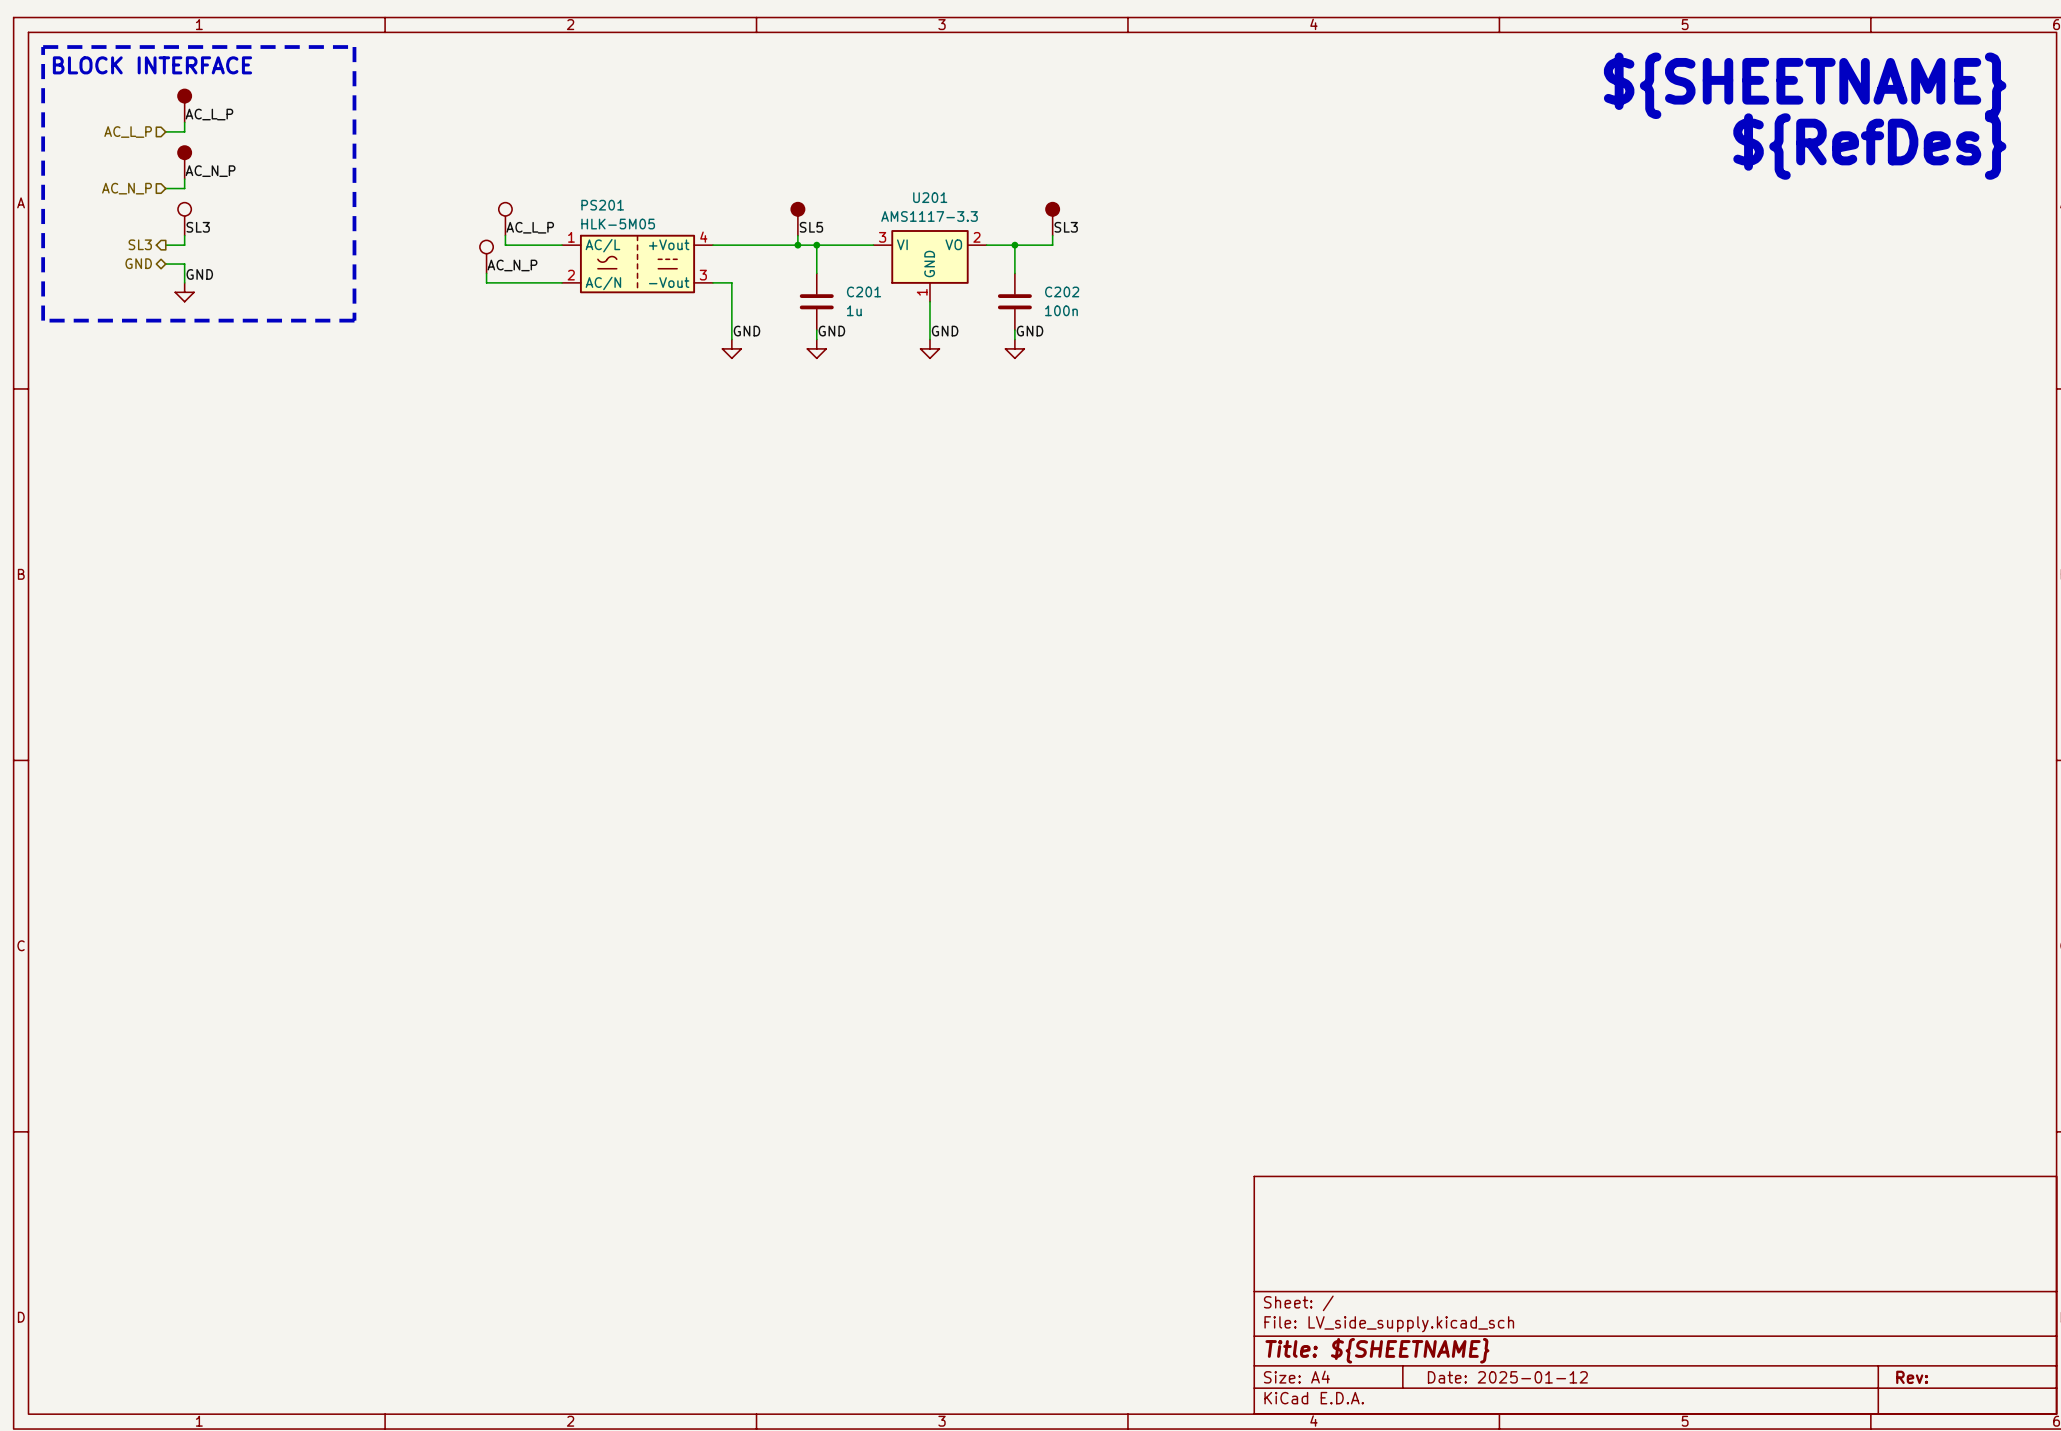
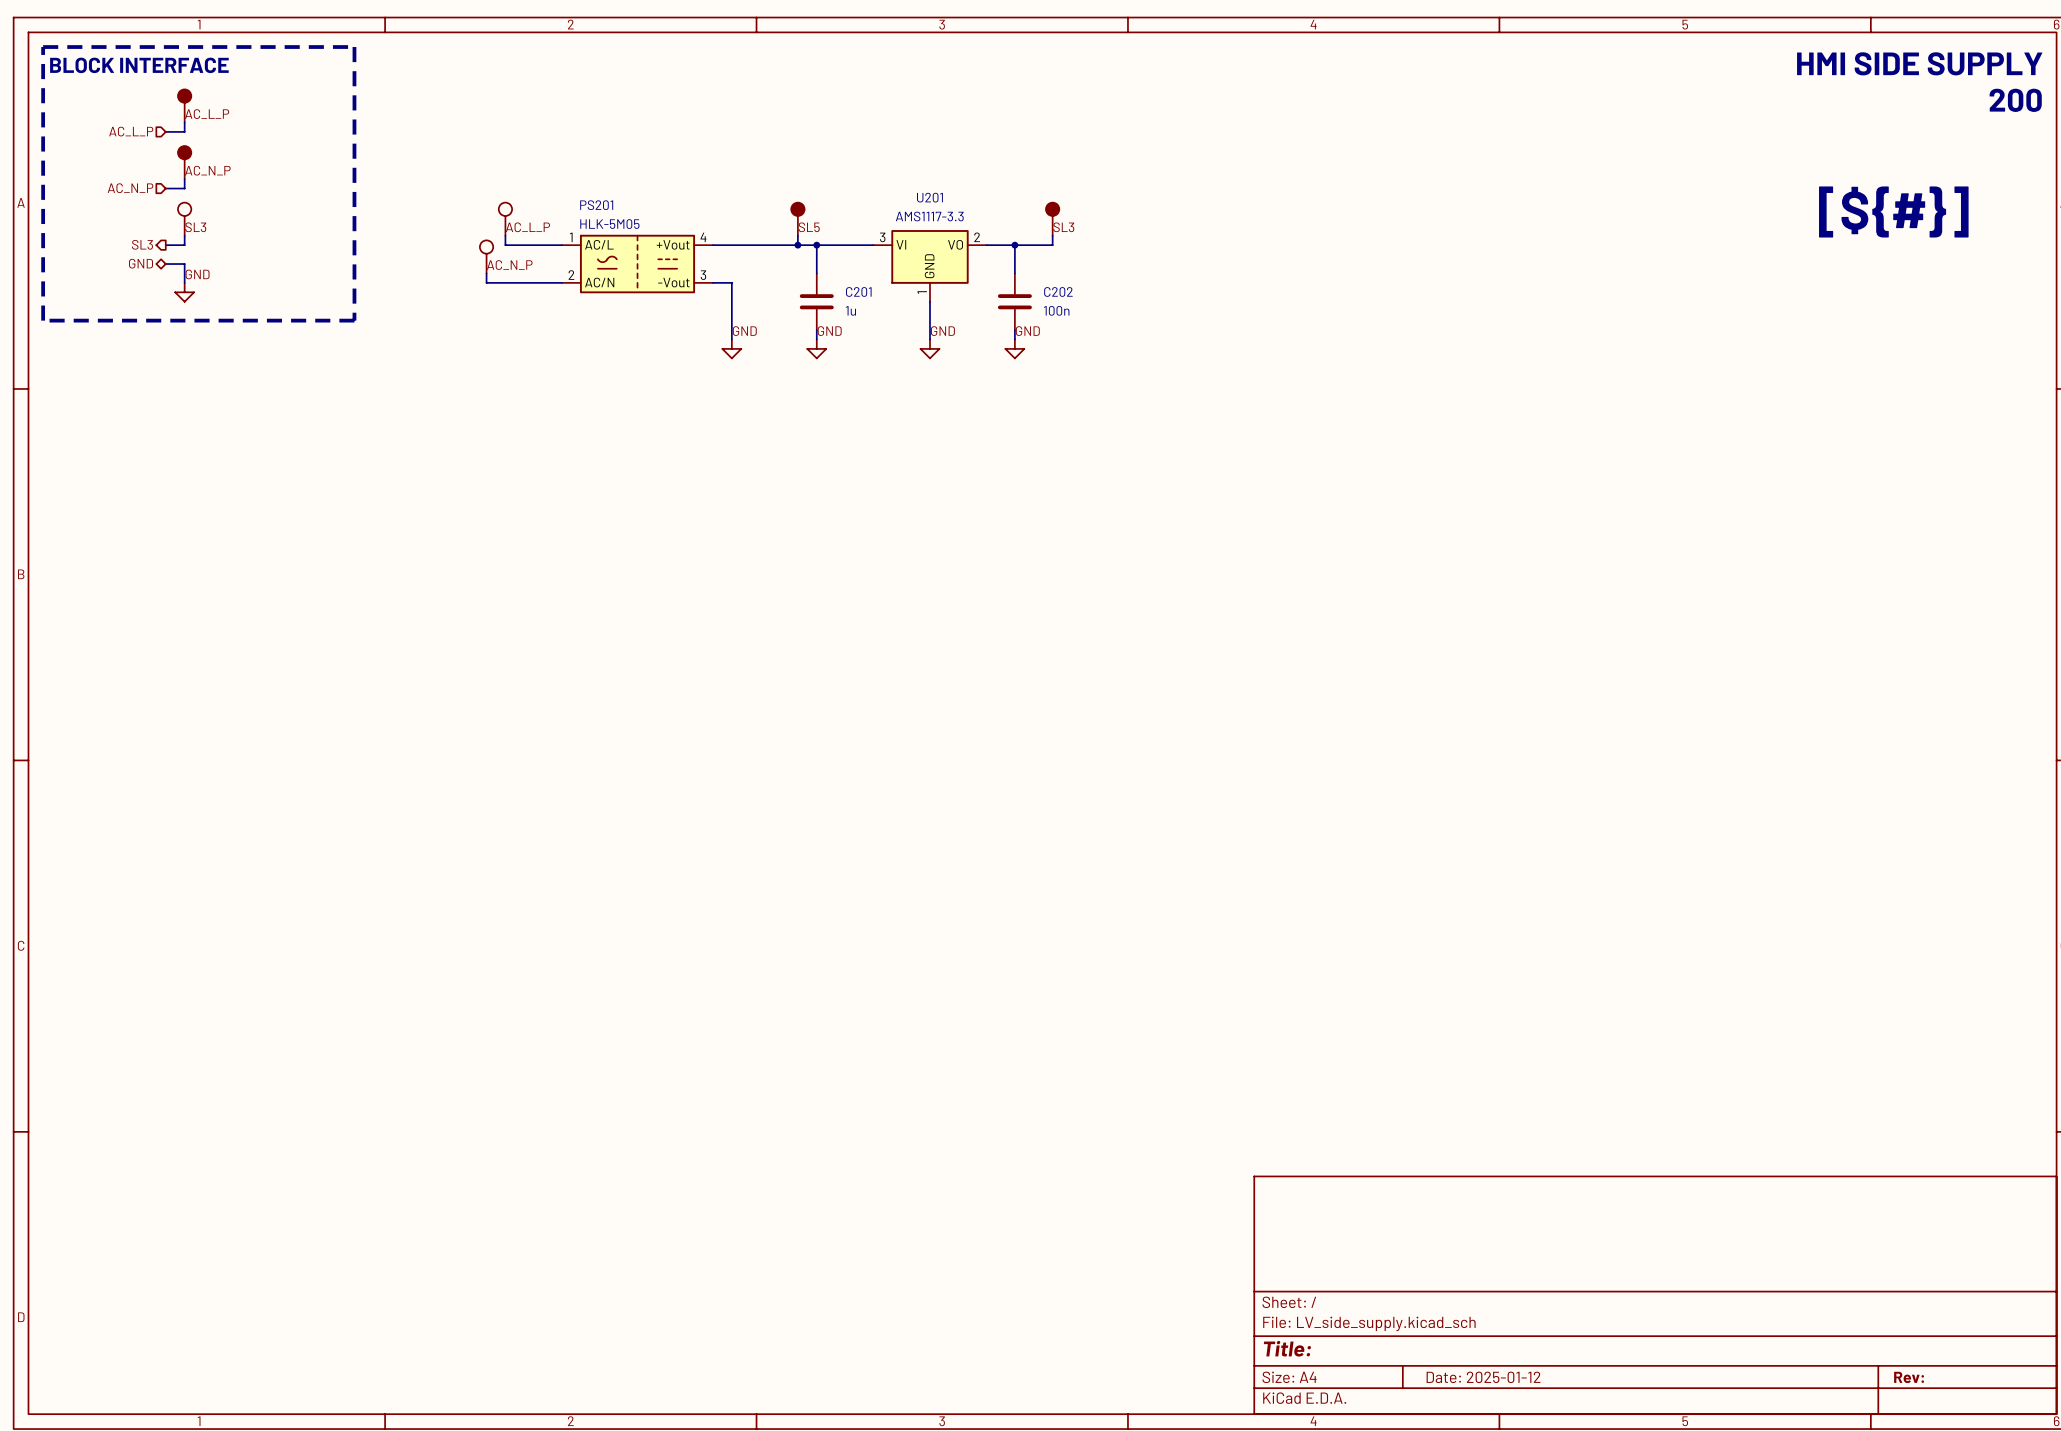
text: none -> HMI SIDE SUPPLY (1919, 63)
text: ${SHEETNAME} (1805, 85) -> none
text: none -> 200 (2015, 100)
text: ${RefDes} (1869, 146) -> none
text: none -> [${#}] (1893, 211)
title block: Title: ${SHEETNAME} (1377, 1350) -> Title: (1287, 1348)

